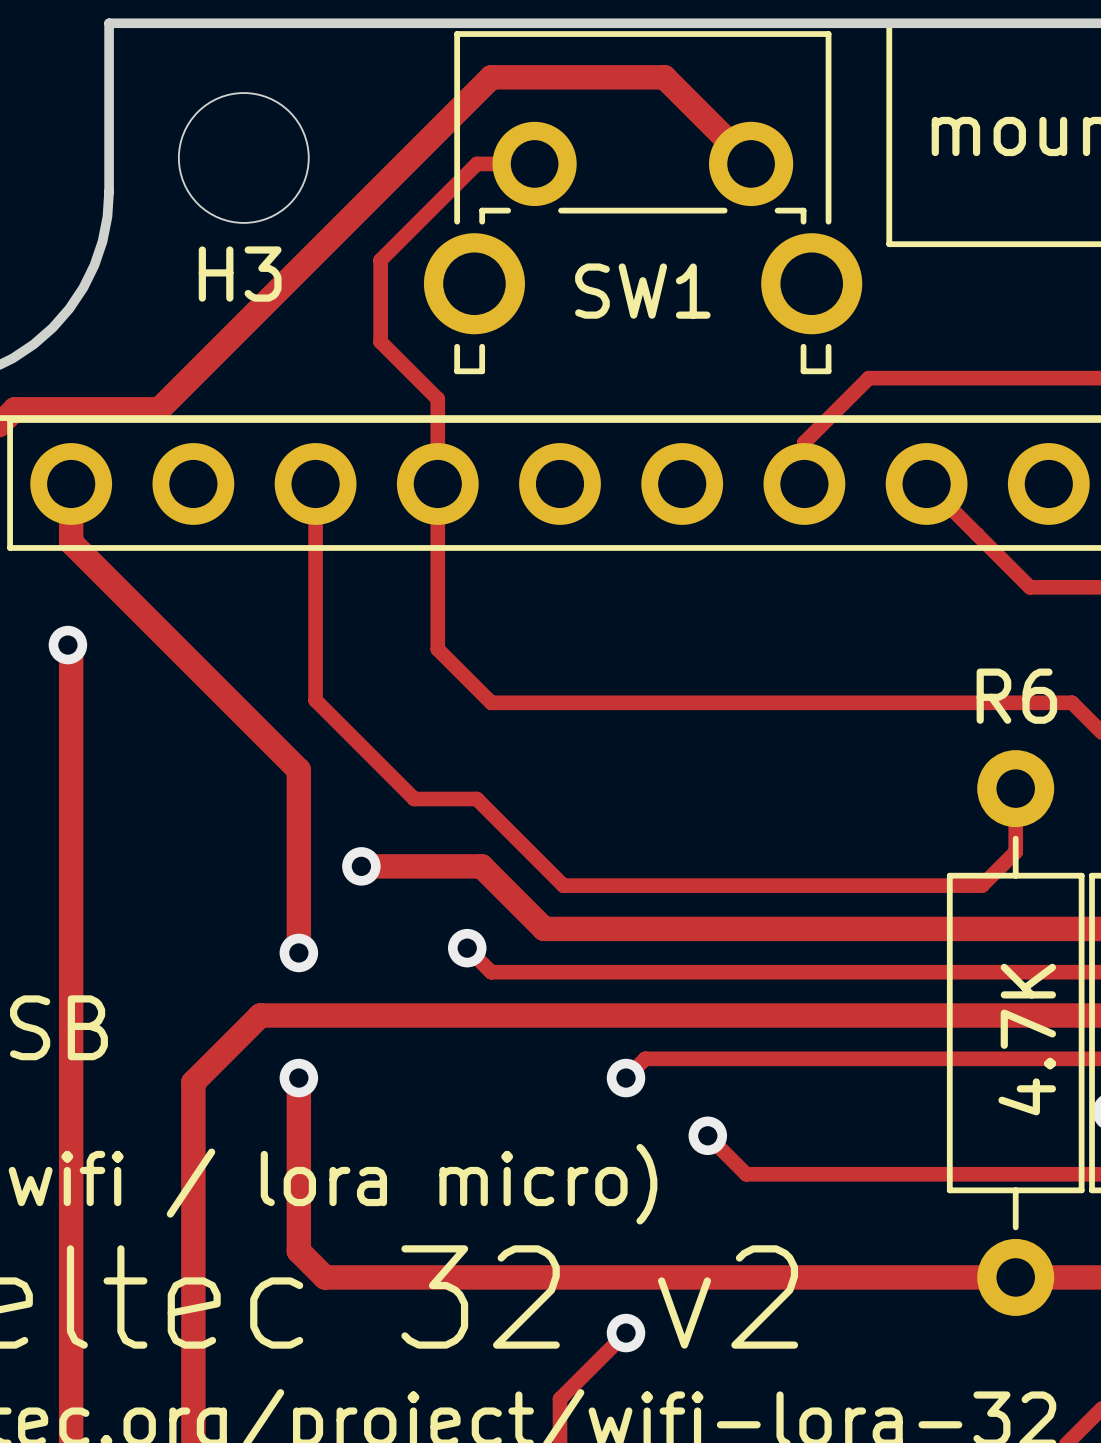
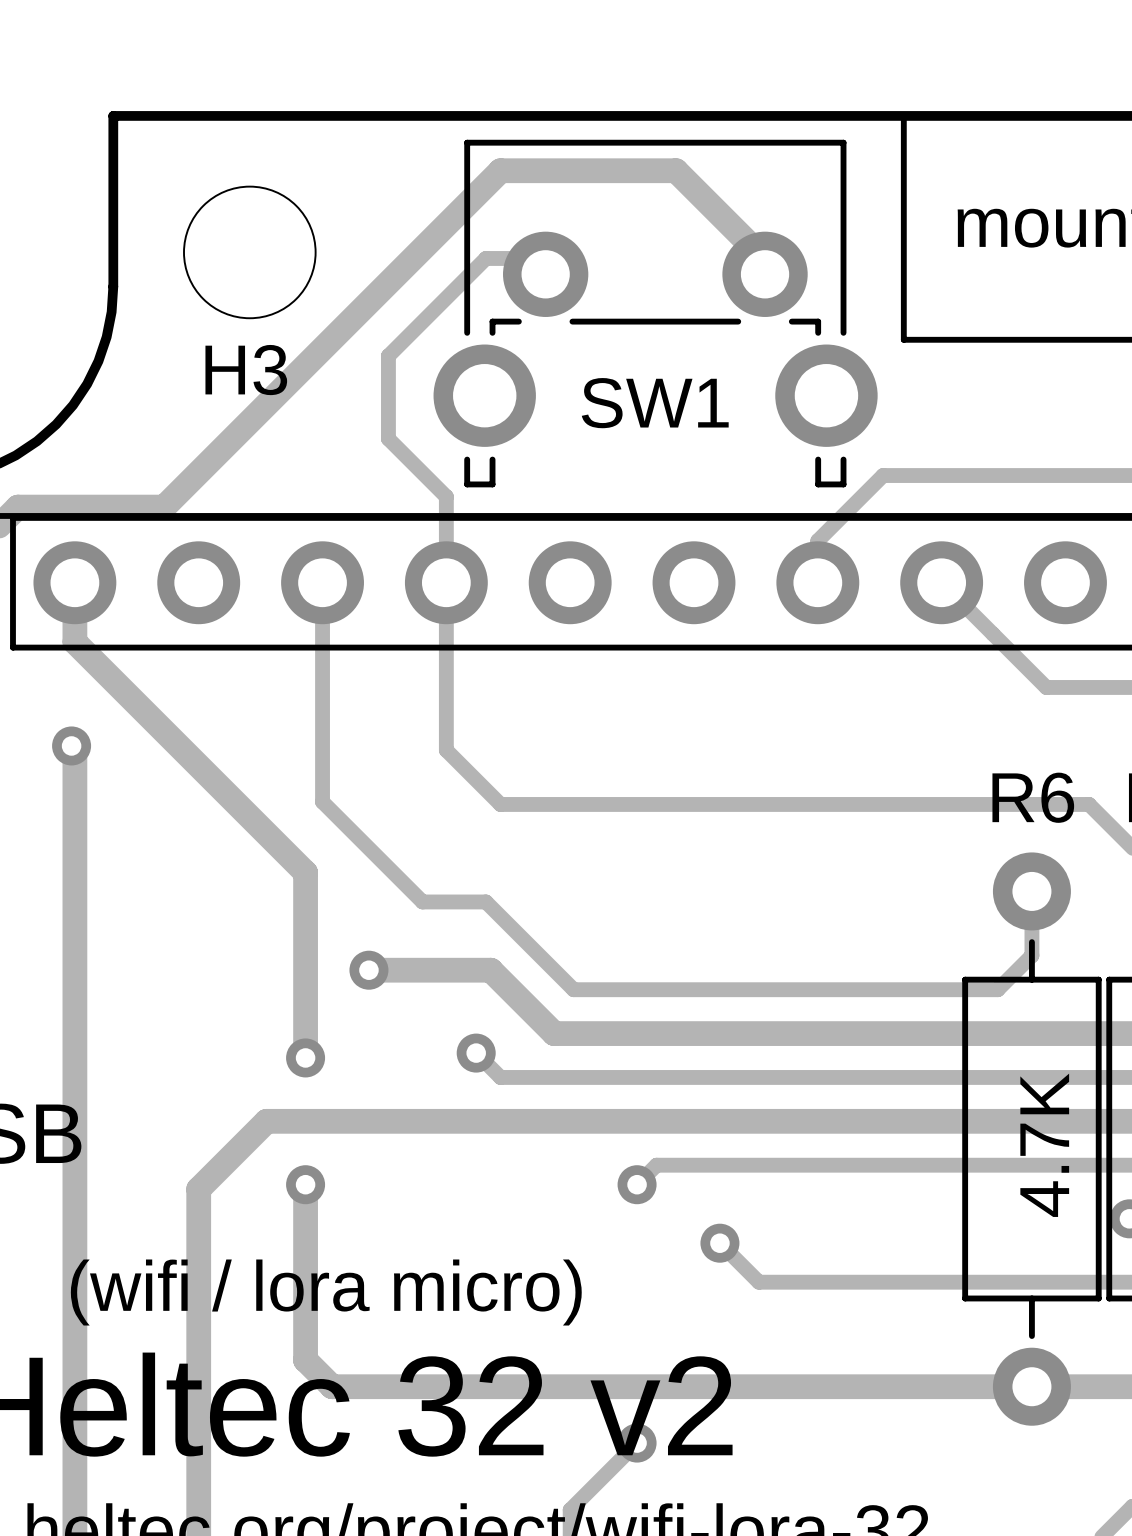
SW1 position: (643, 202) -> (655, 313)

